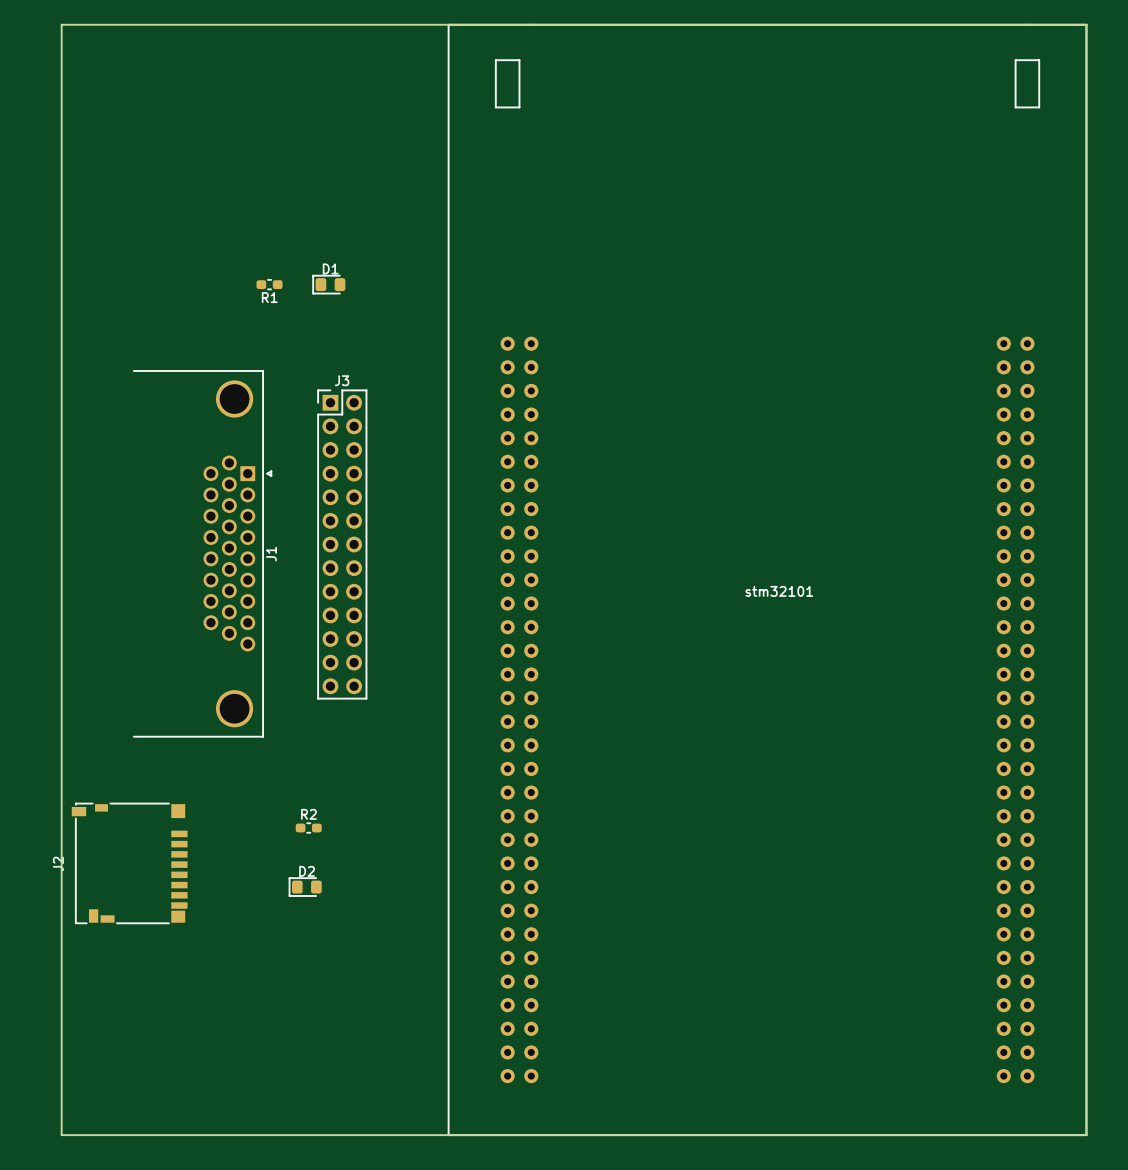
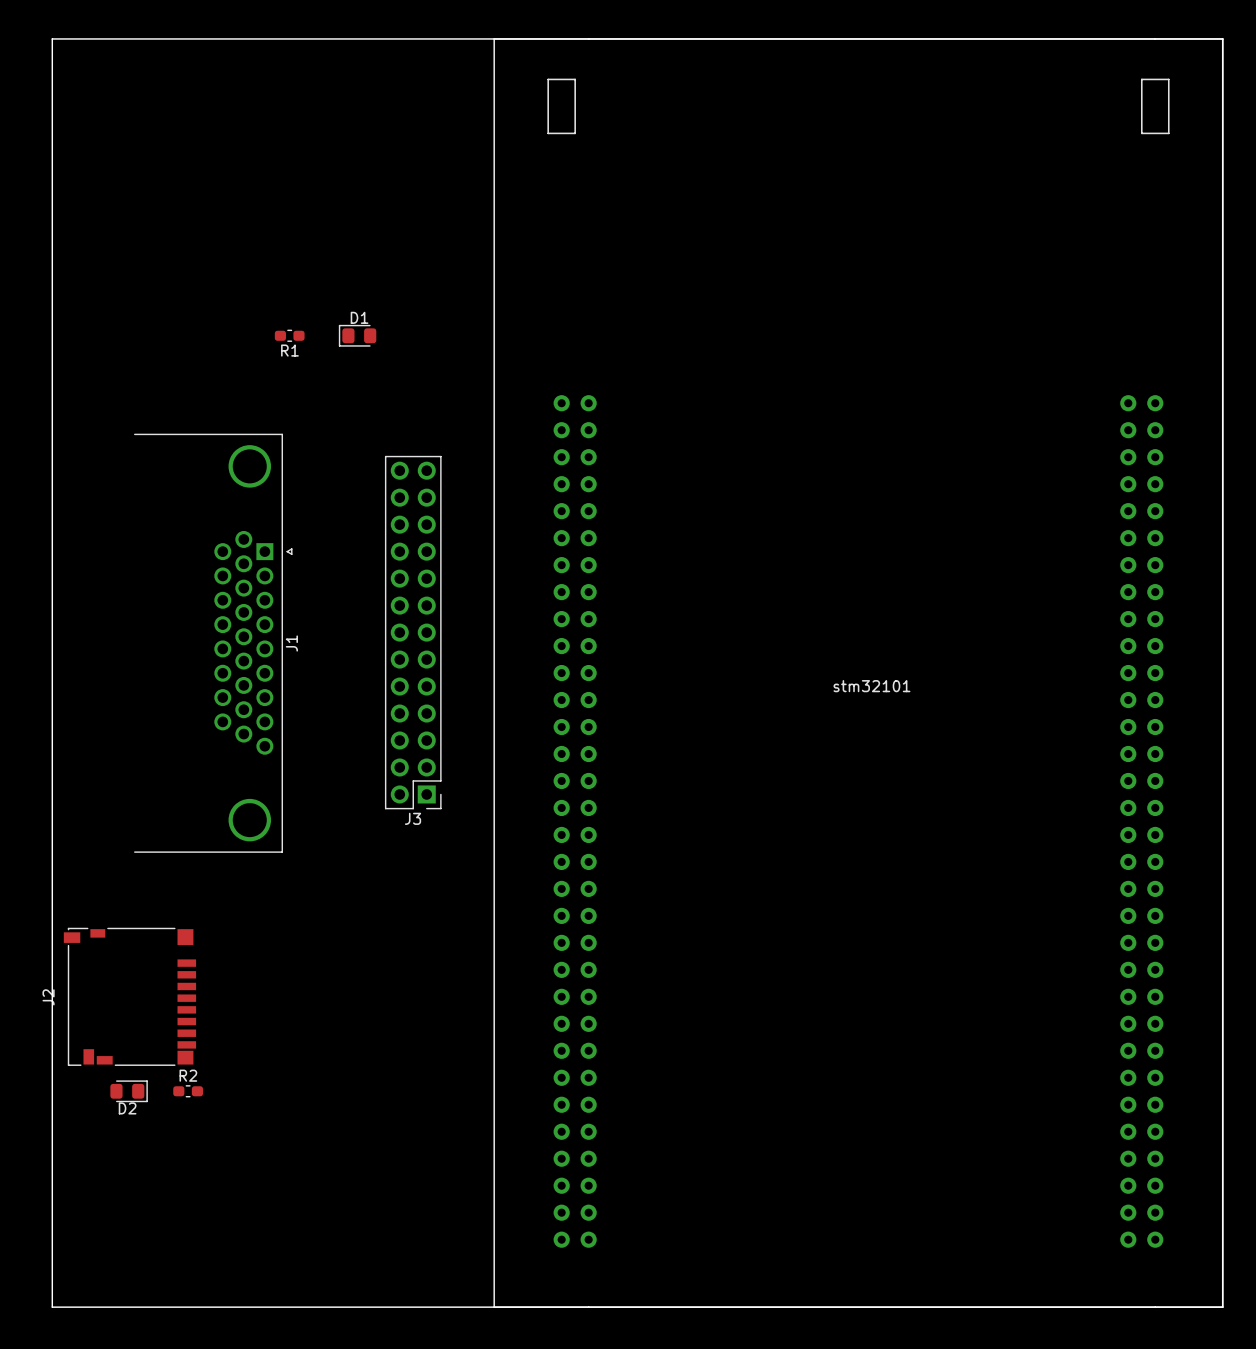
J3 rotation: 0° (342, 544) -> 180° (413, 632)
R2 position: (308, 828) -> (188, 1091)
D2 rotation: 0° (305, 887) -> 180° (129, 1091)
D2 position: (305, 887) -> (129, 1091)

